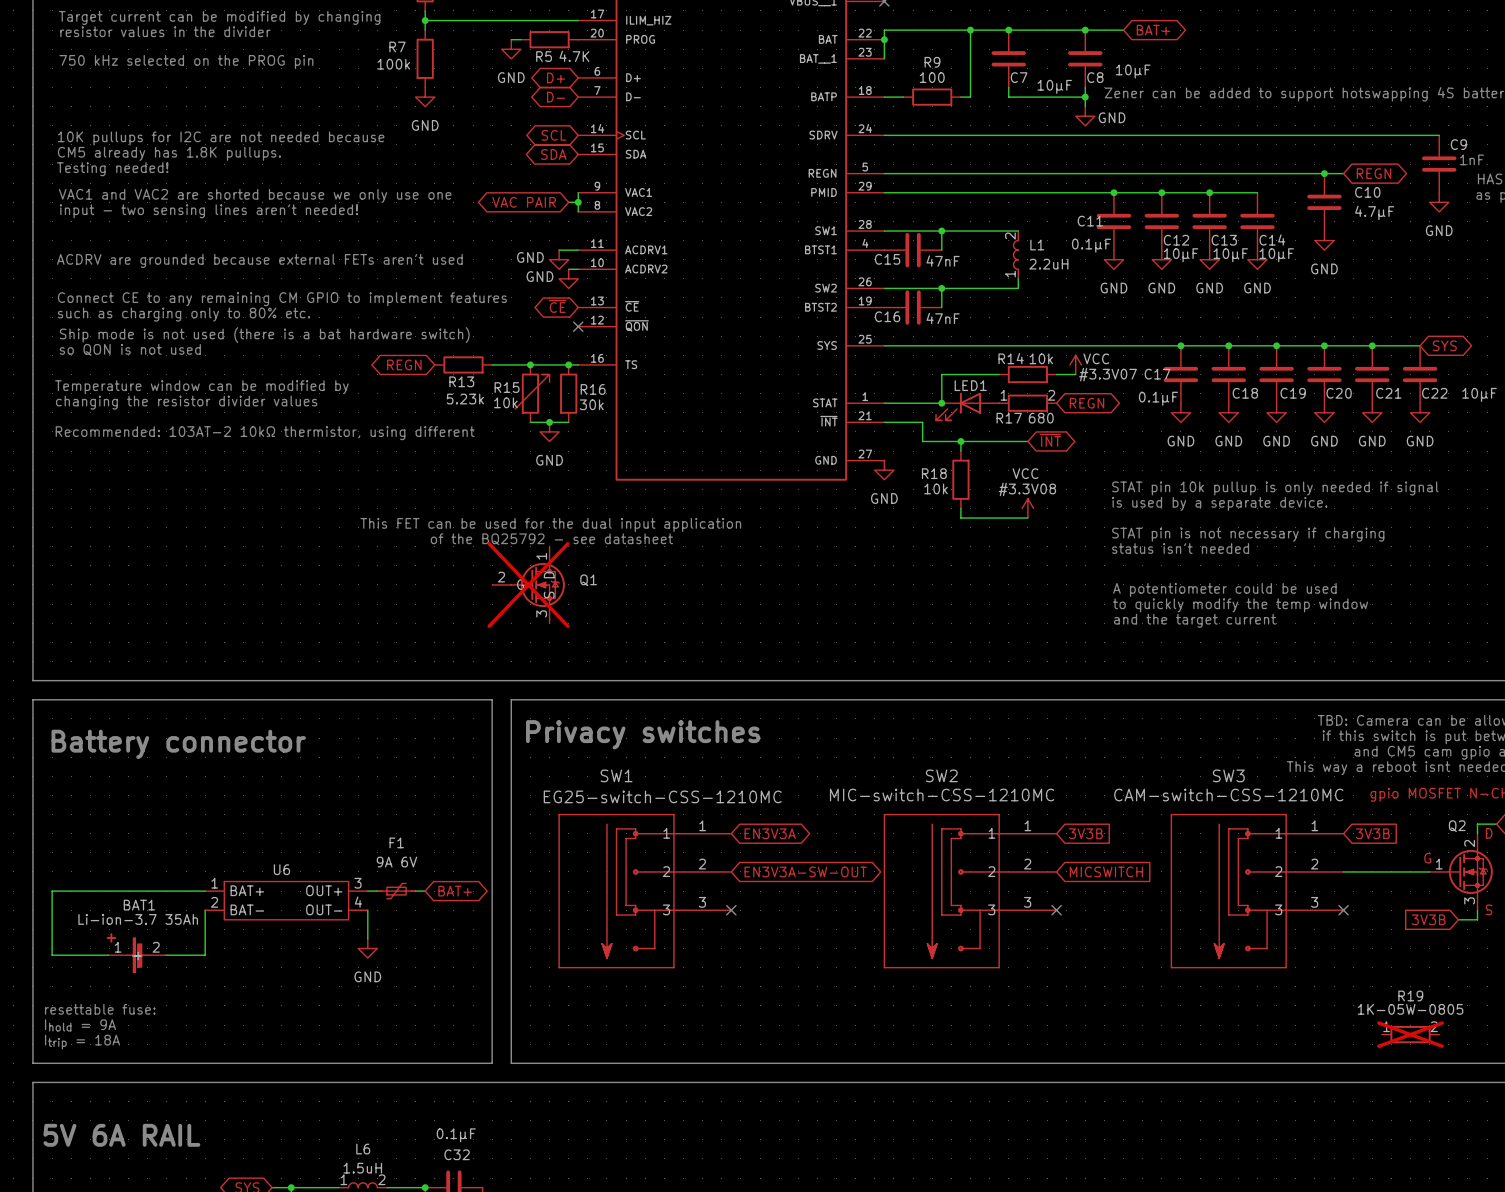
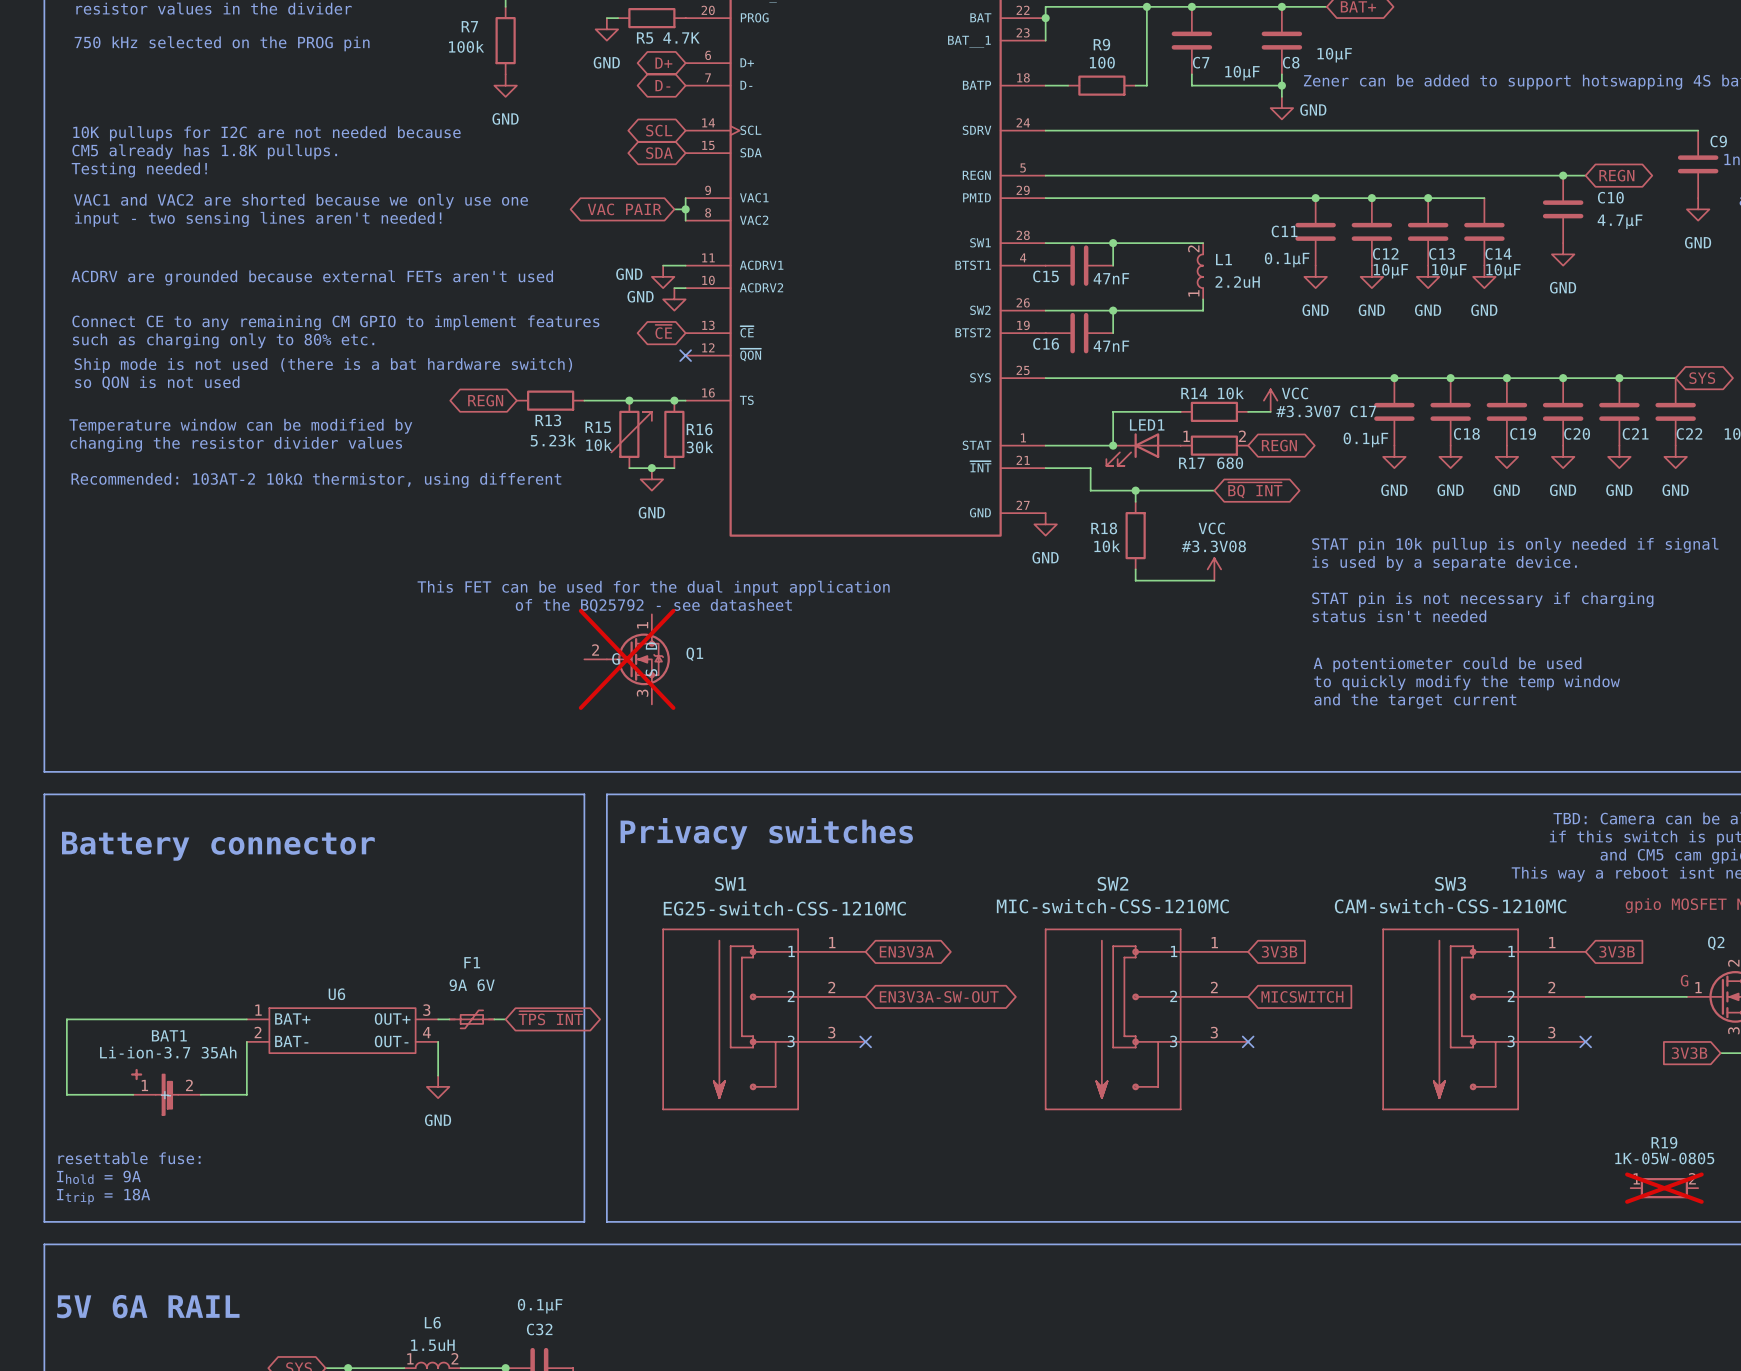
global label: ~{INT} (1050, 440) -> ~{BQ INT} (1255, 490)
global label: BAT+ (455, 891) -> ~{TPS INT} (550, 1018)

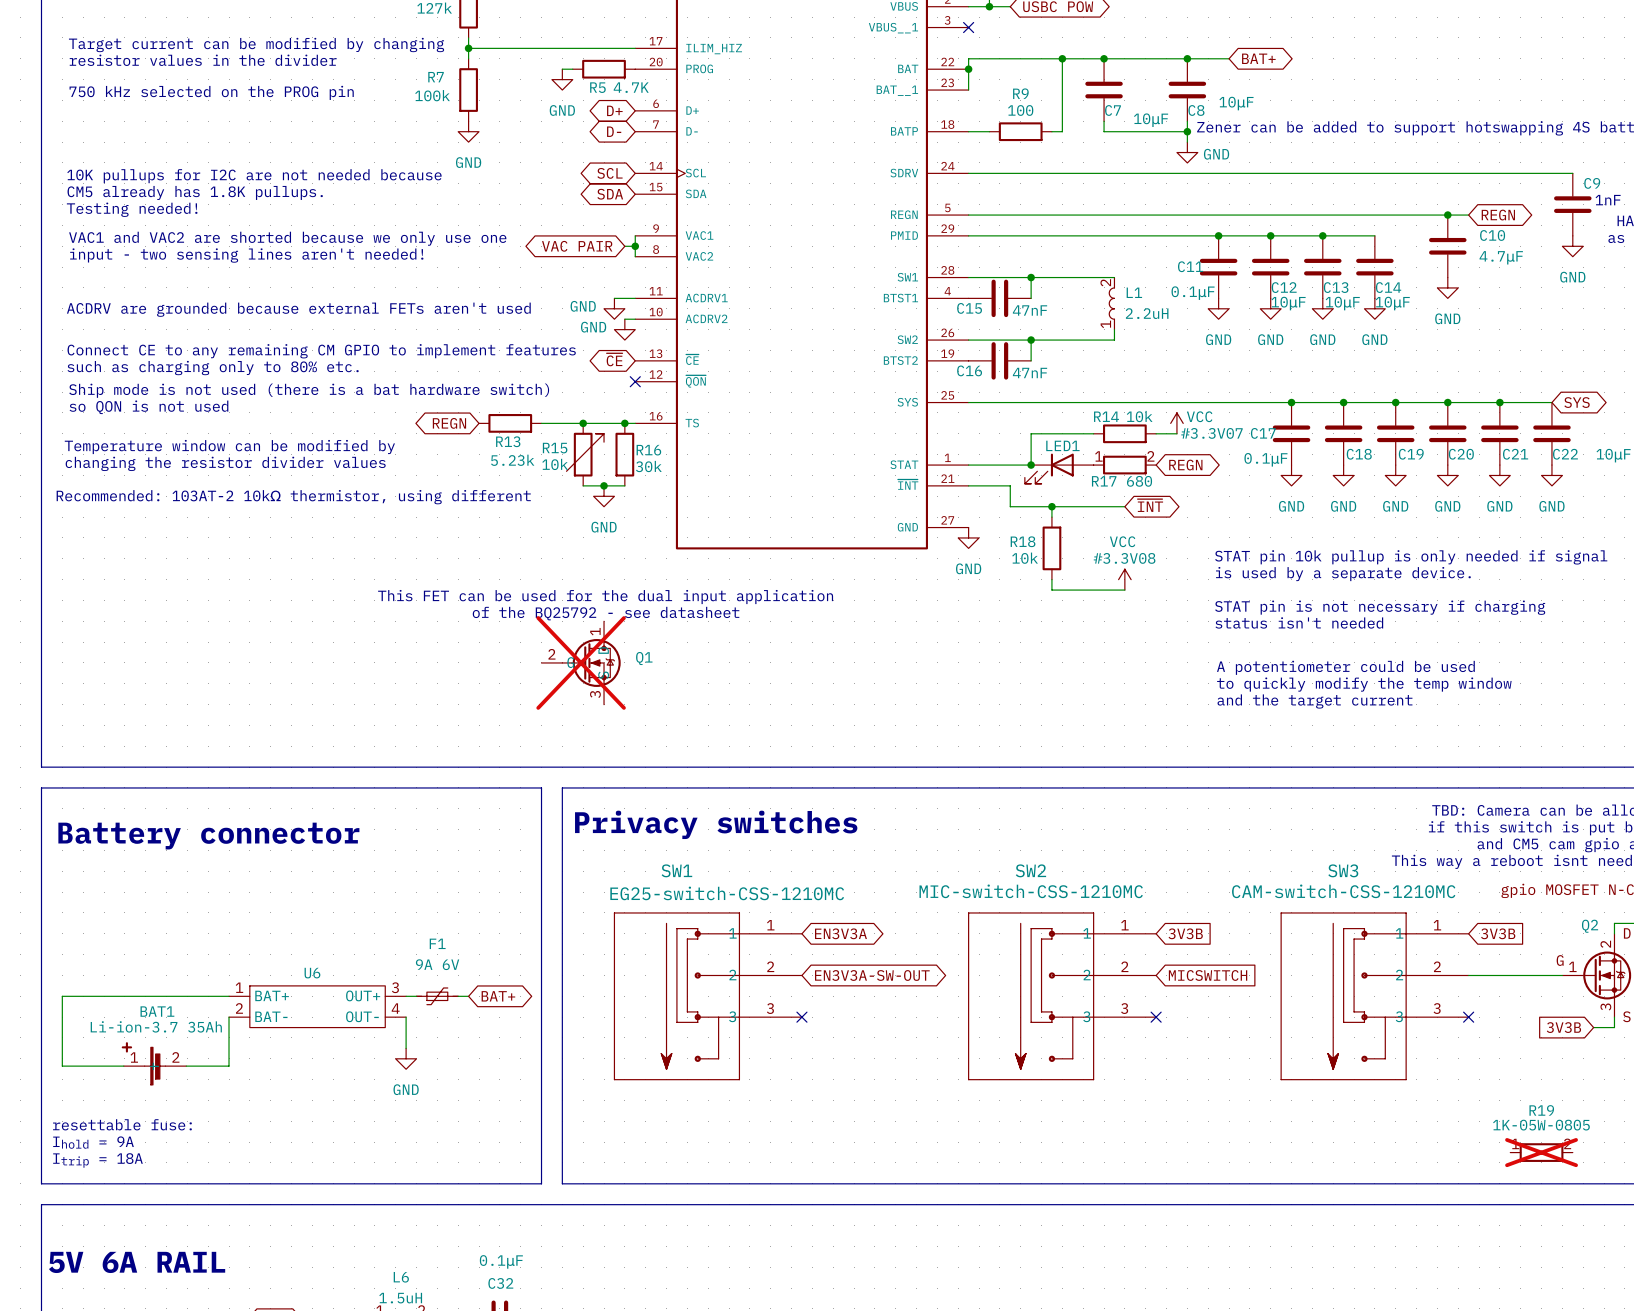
global label: ~{BQ INT} (1255, 490) -> ~{INT} (1150, 505)
global label: ~{TPS INT} (550, 1018) -> BAT+ (498, 996)

